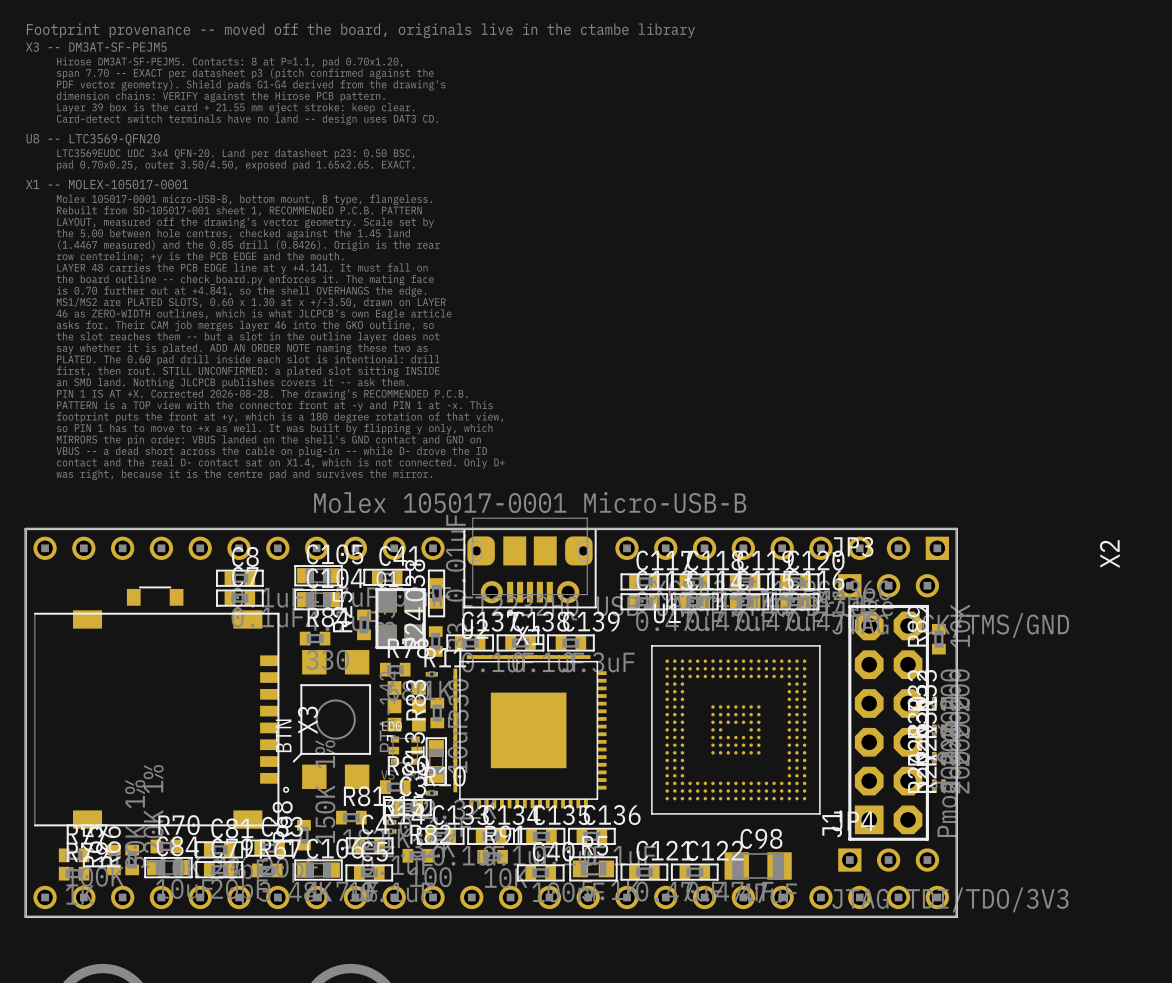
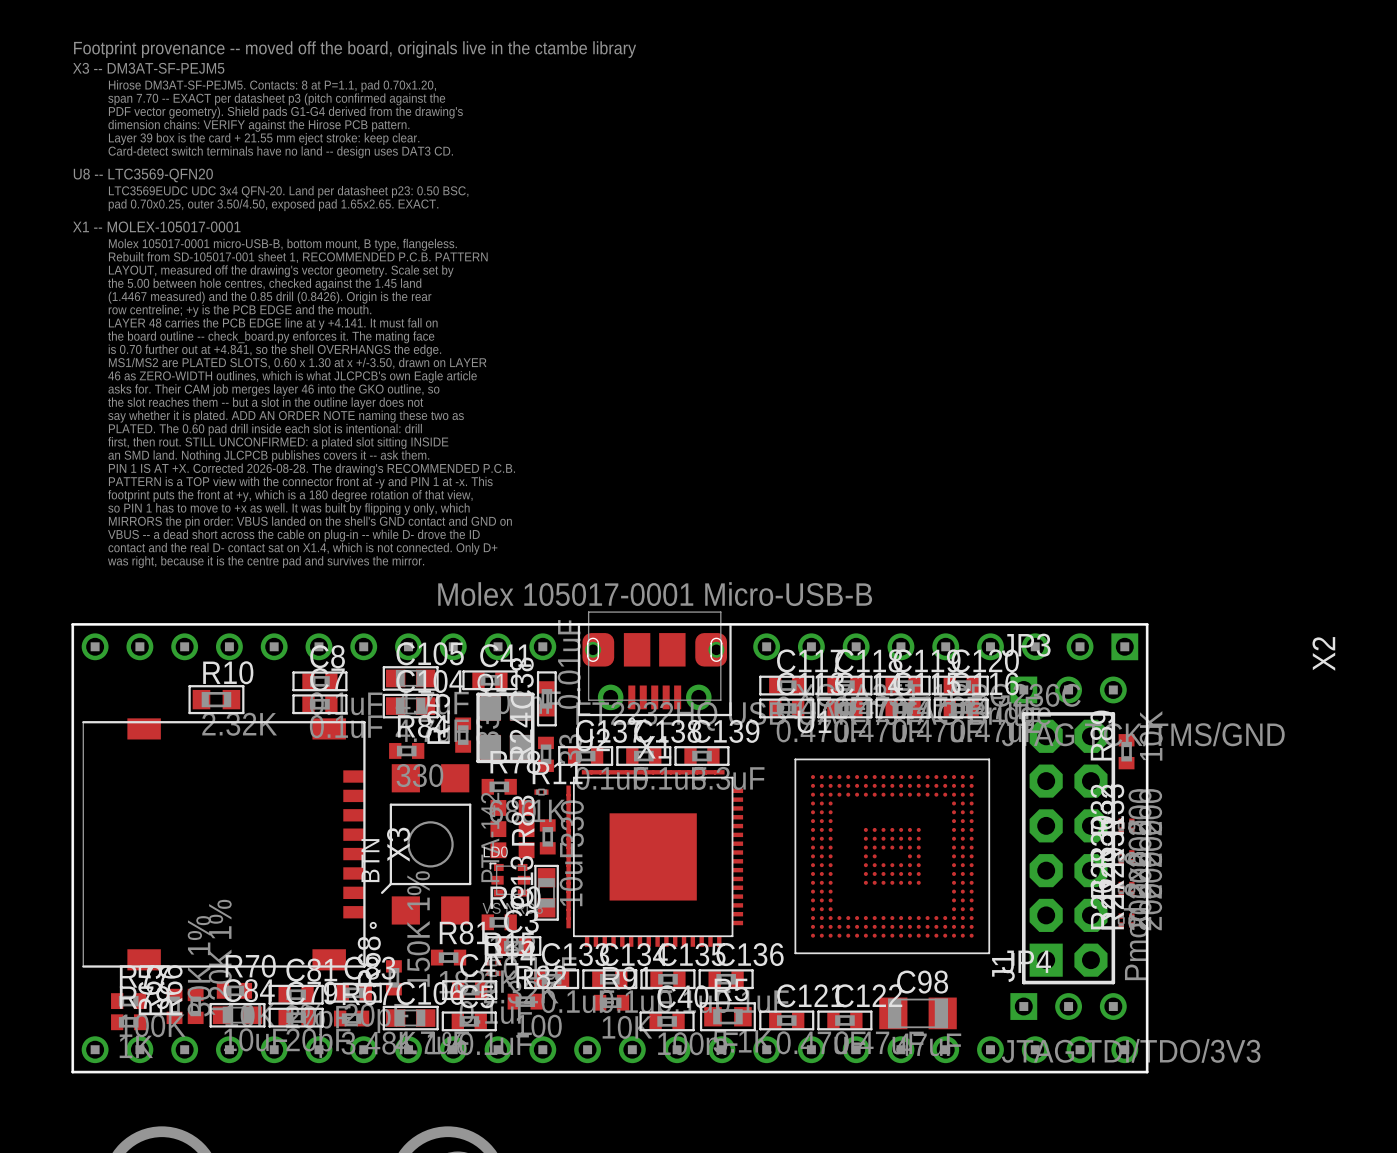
part: (155, 596) -> none
R10 footprint: [425, 790, 438, 797] -> [188, 685, 245, 715]

